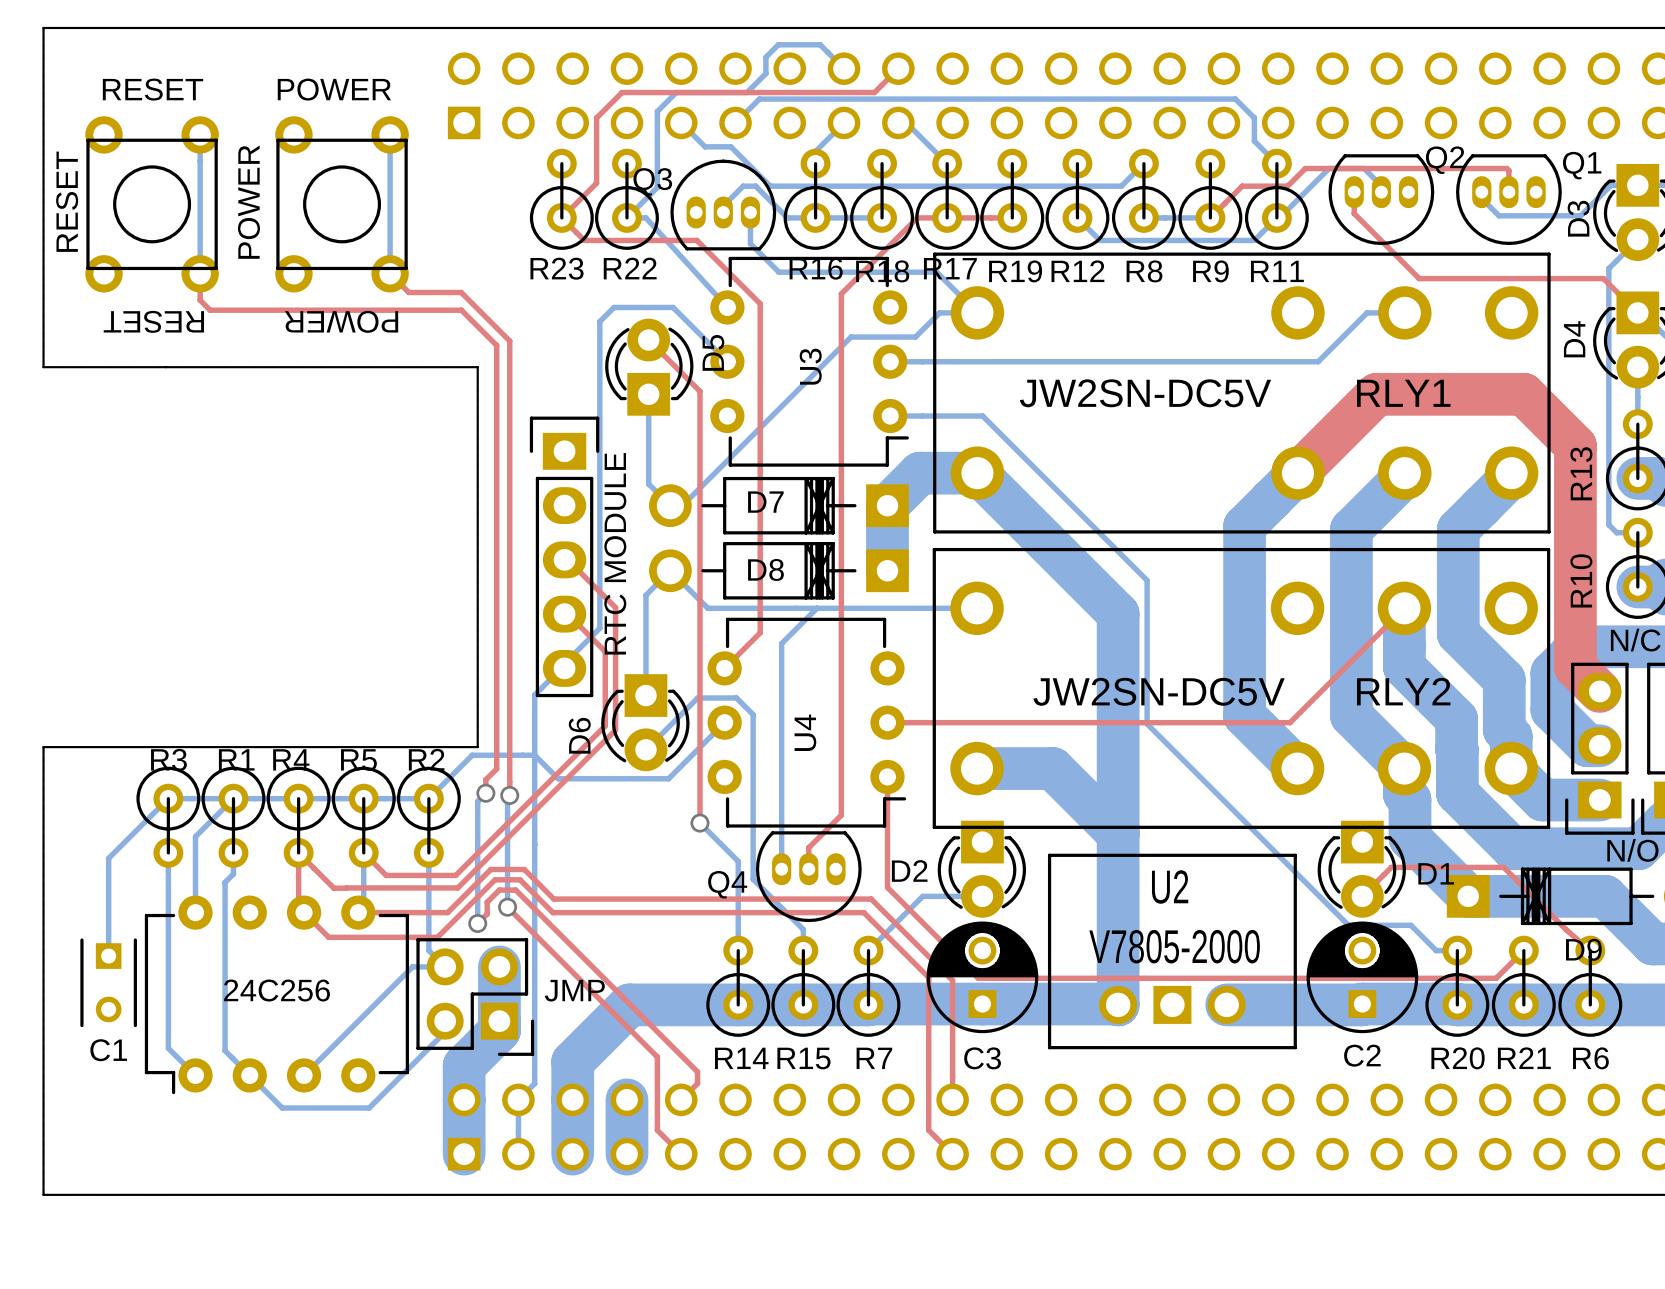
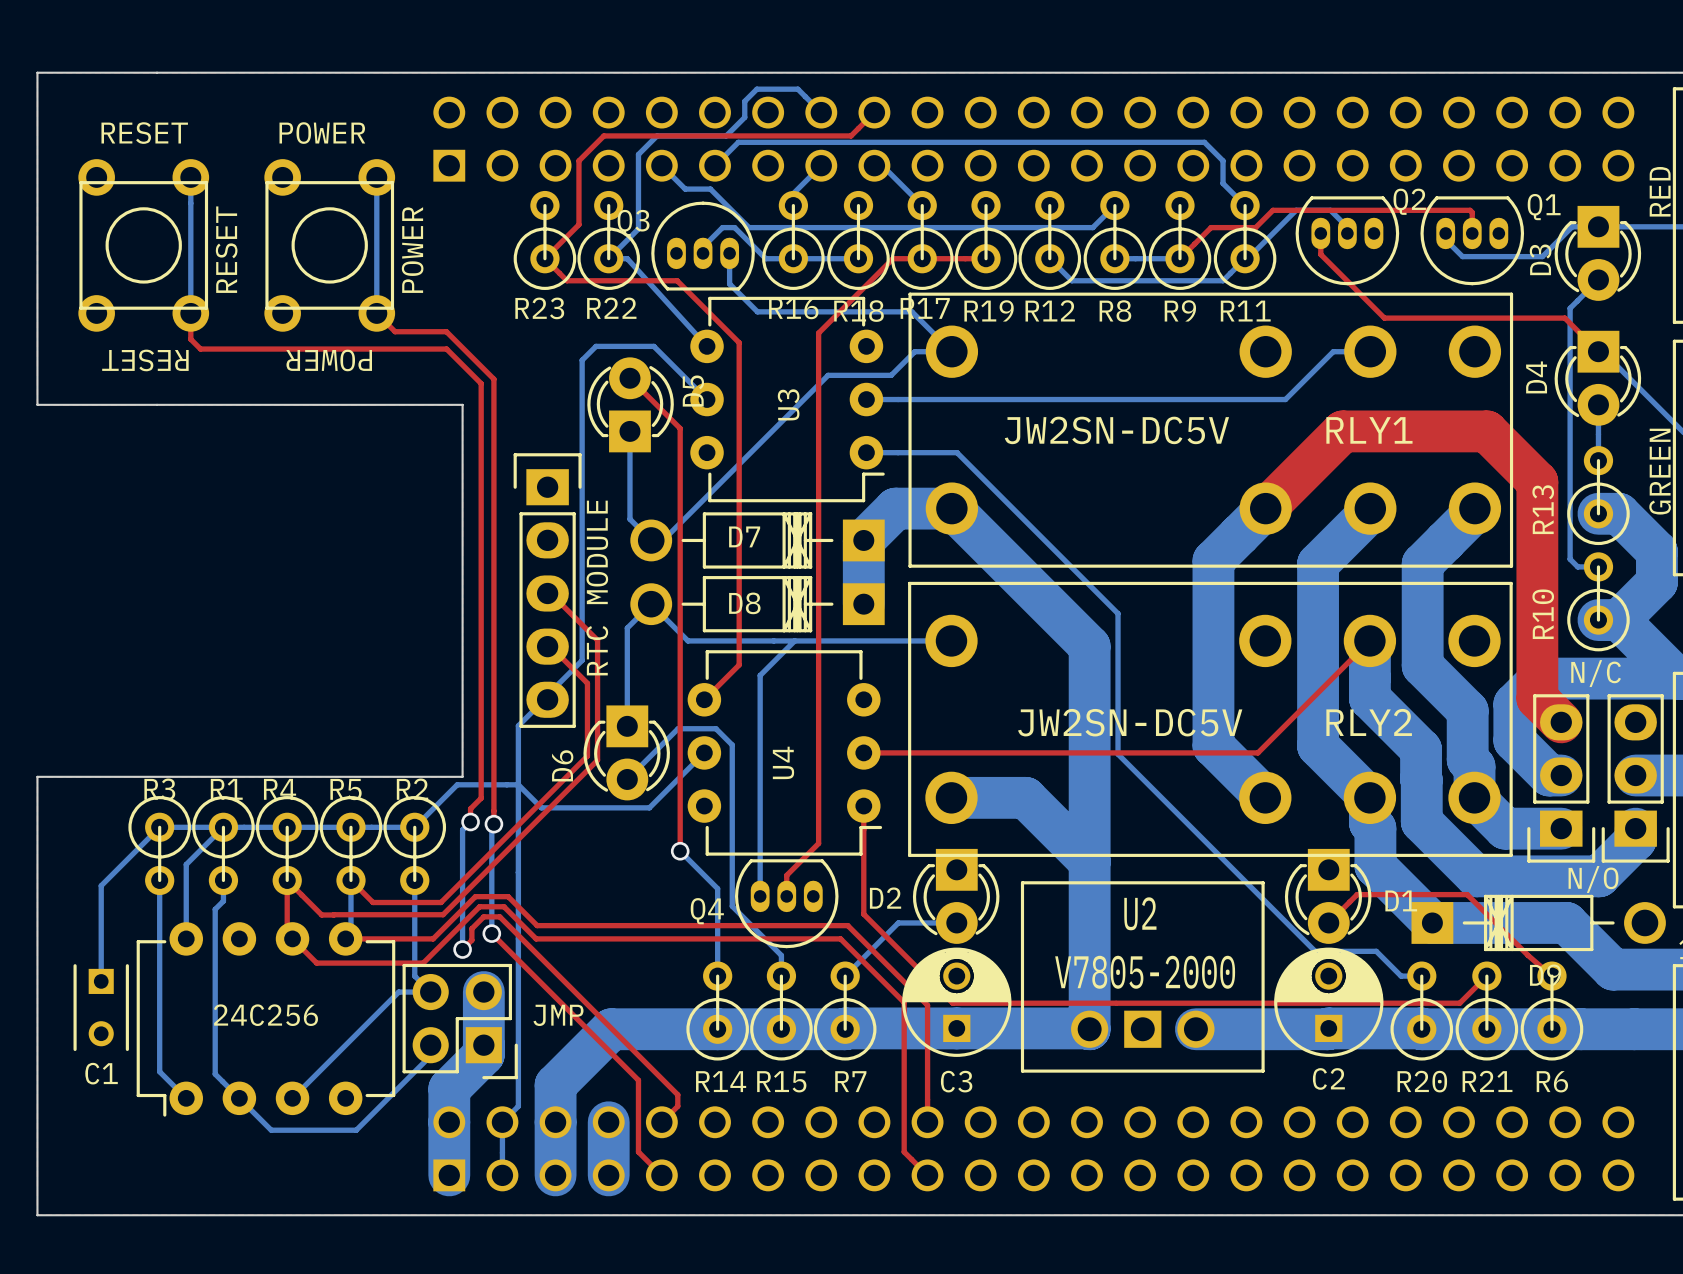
RESET name position: RESET (67, 201) -> RESET (226, 249)
POWER name position: POWER (248, 202) -> POWER (412, 250)

